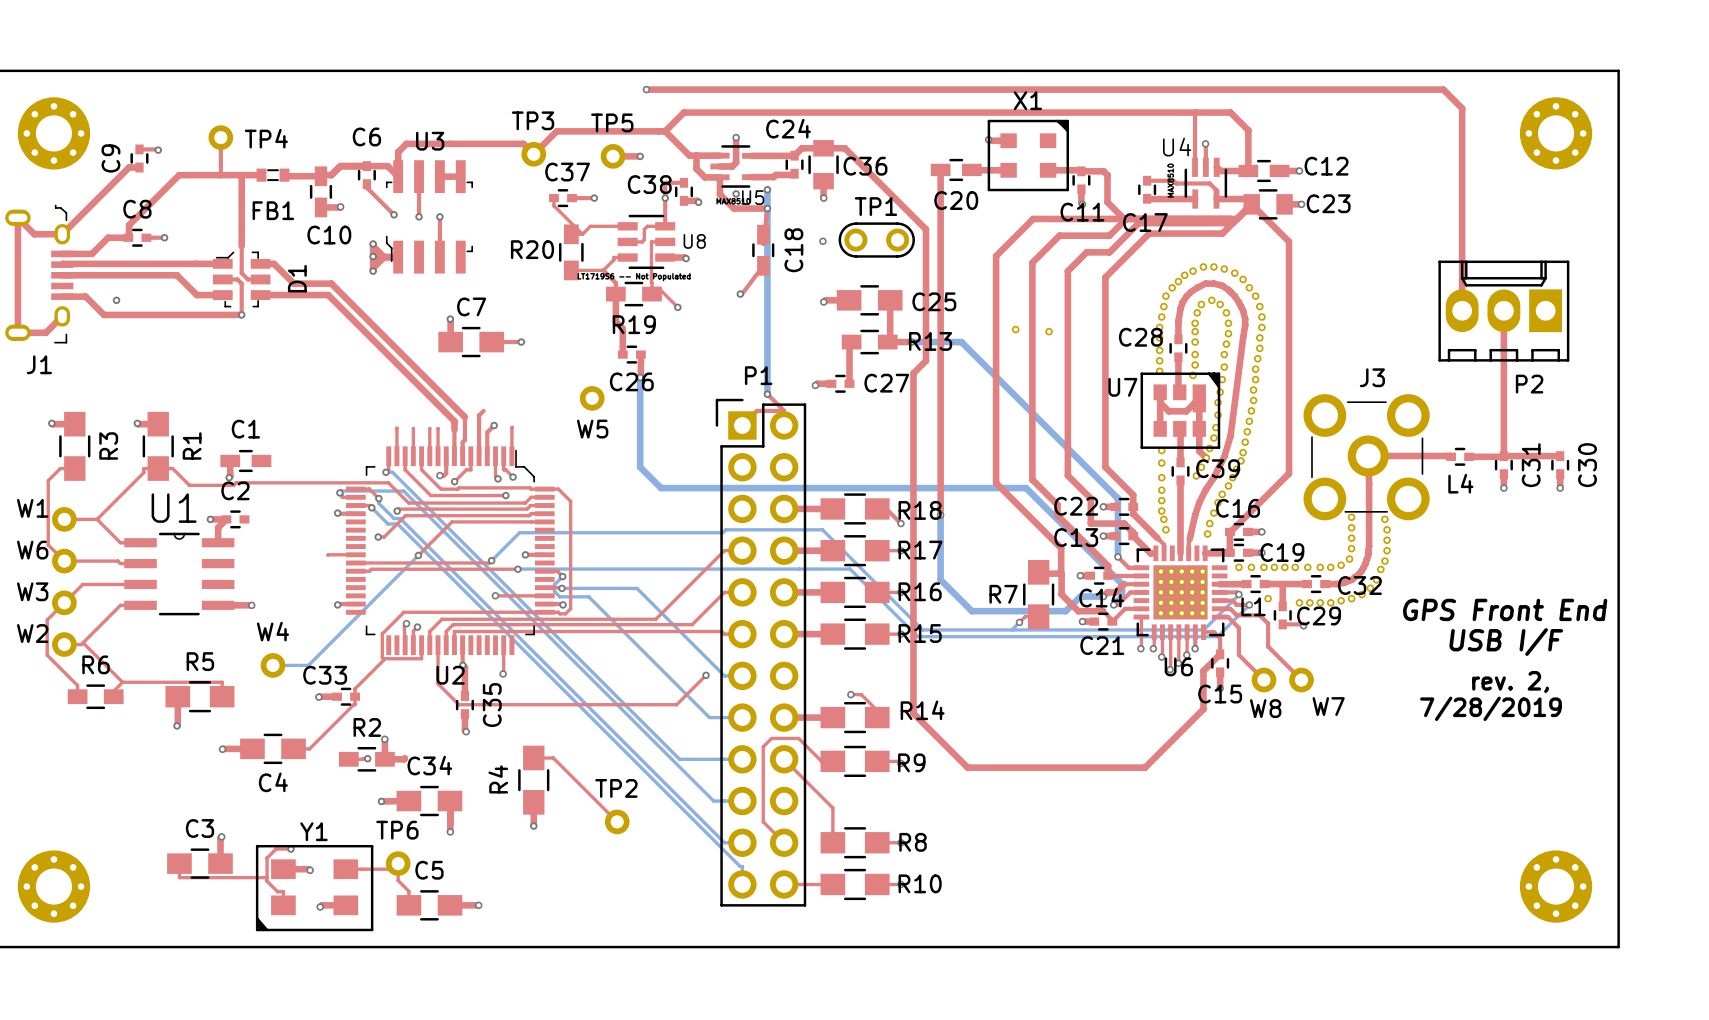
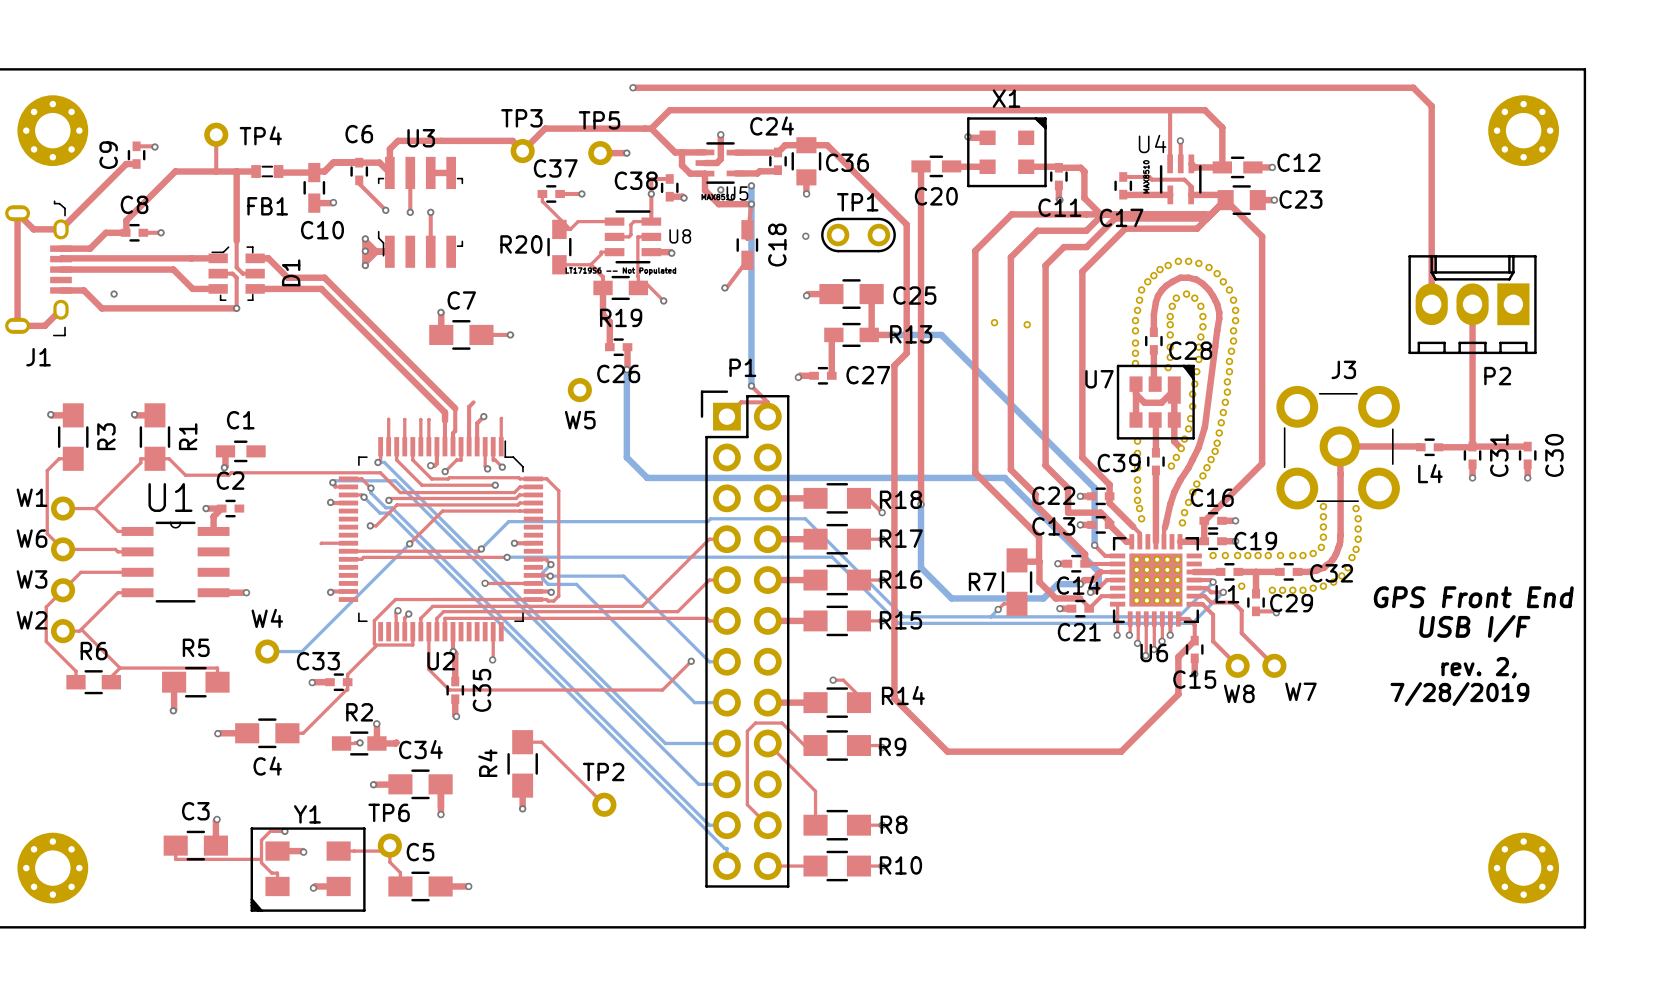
C28 name position: C28 (1140, 337) -> C28 (1190, 350)
C39 name position: C39 (1218, 468) -> C39 (1119, 463)

